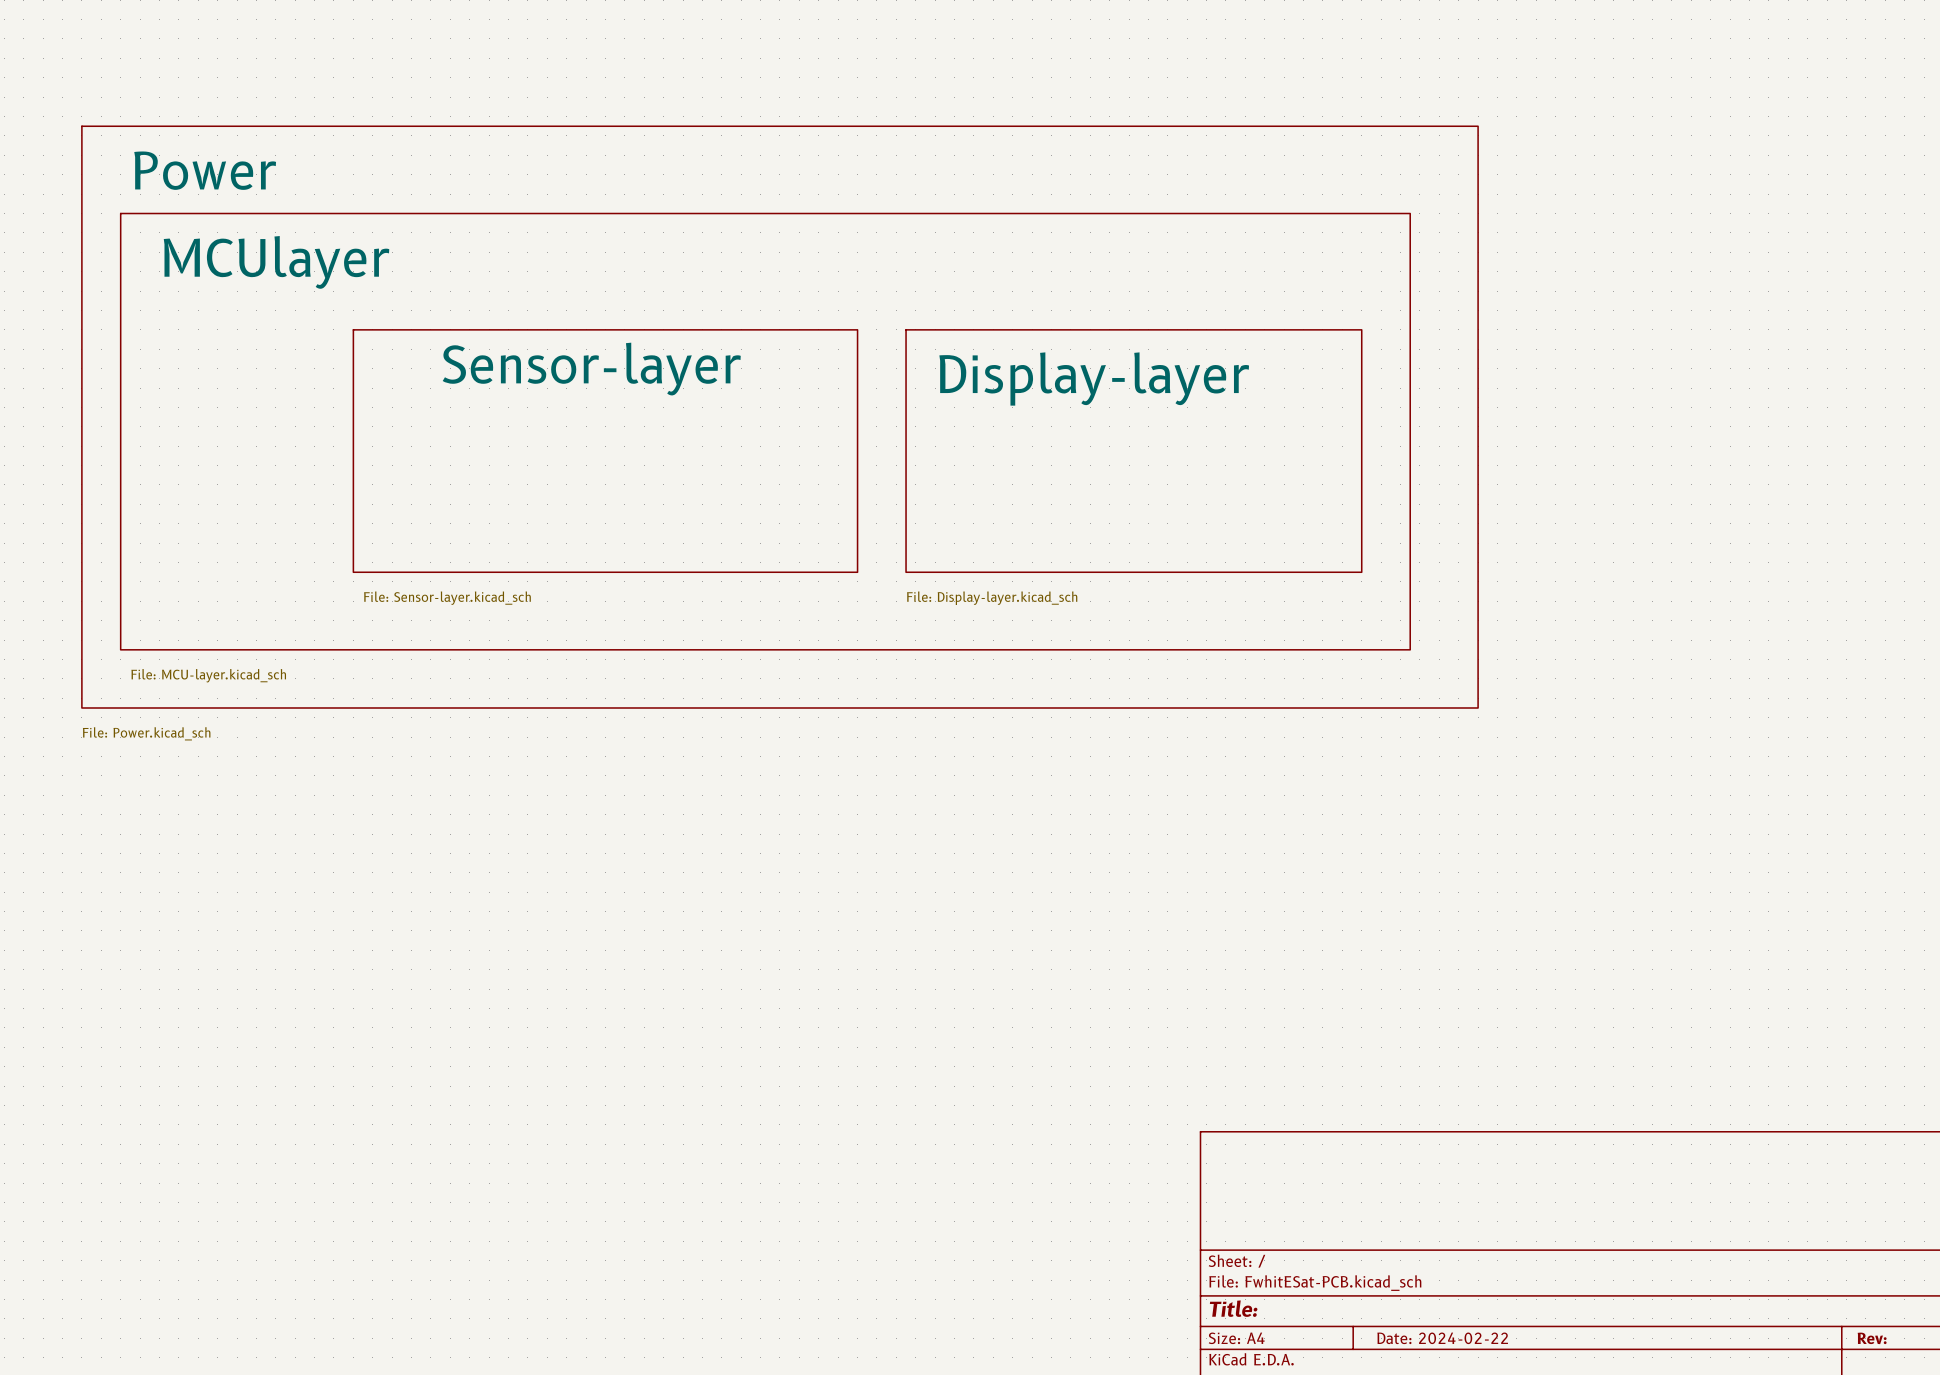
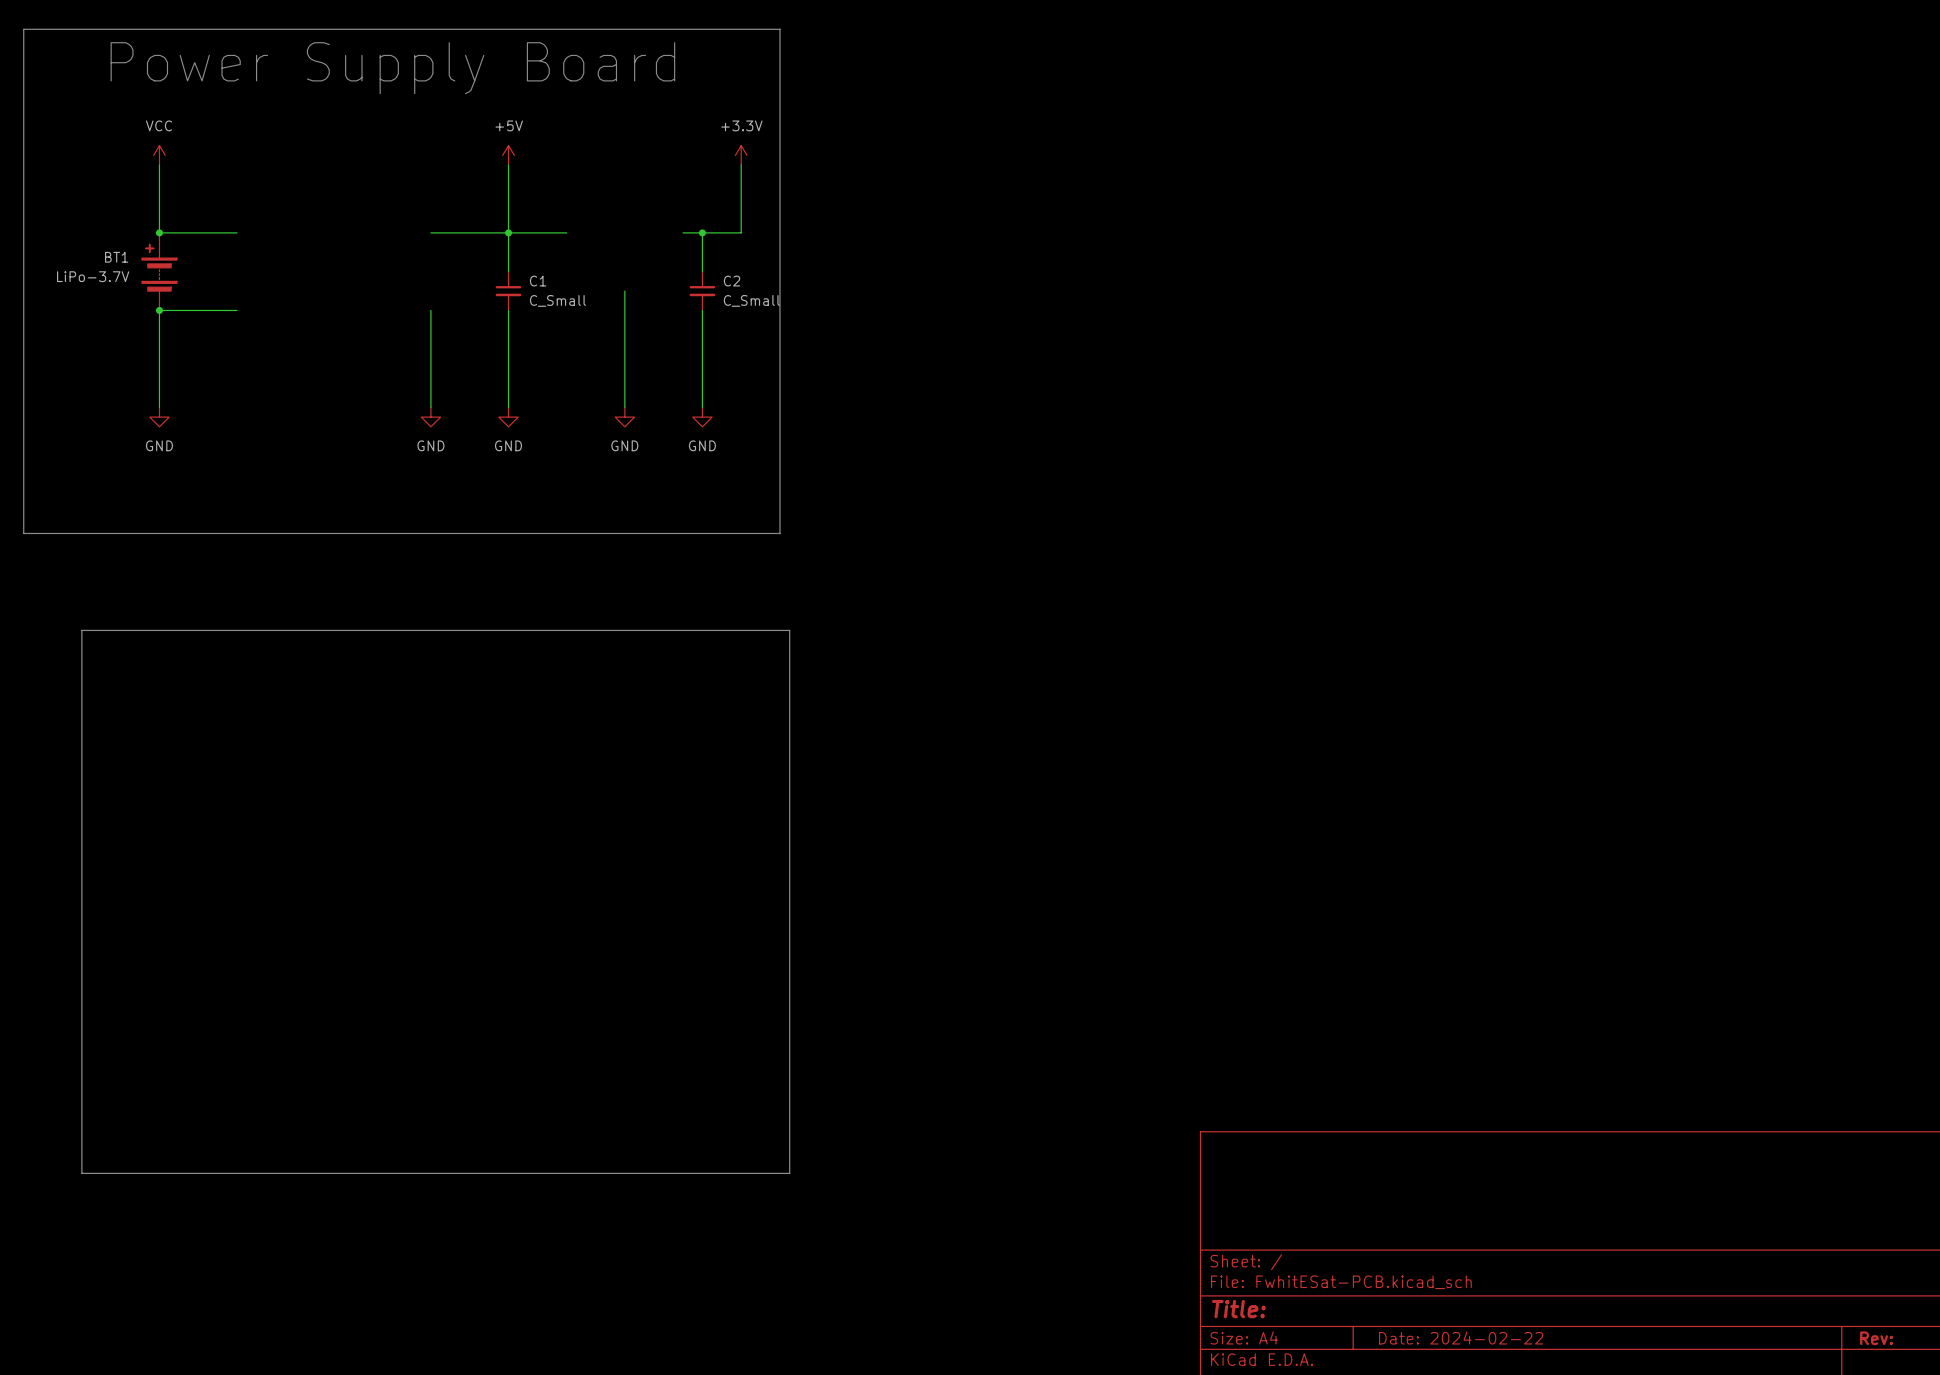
line: none -> (23, 29) (779, 29) (779, 533) (23, 533) (23, 29)
text: none -> Power Supply Board (392, 68)
power symbol: none -> VCC (159, 155)
power symbol: none -> +5V (508, 155)
power symbol: none -> +3.3V (741, 155)
wire: none -> (159, 165) (159, 232) (237, 232)
wire: none -> (508, 165) (508, 271)
wire: none -> (741, 165) (741, 232) (683, 232)
junction: none -> (159, 232)
wire: none -> (430, 232) (566, 232)
junction: none -> (508, 232)
wire: none -> (702, 232) (702, 271)
junction: none -> (702, 232)
BT1: none -> LiPo-3.7V (159, 271)
C1: none -> C_Small (508, 291)
wire: none -> (624, 291) (624, 407)
C2: none -> C_Small (702, 291)
junction: none -> (159, 310)
wire: none -> (237, 310) (159, 310) (159, 407)
wire: none -> (430, 310) (430, 407)
wire: none -> (508, 310) (508, 407)
wire: none -> (702, 310) (702, 407)
power symbol: none -> GND (159, 417)
power symbol: none -> GND (430, 417)
power symbol: none -> GND (508, 417)
power symbol: none -> GND (624, 417)
power symbol: none -> GND (702, 417)
sheet Power: File: Power.kicad_sch (779, 417) -> none
sheet MCUlayer: File: MCU-layer.kicad_sch (765, 431) -> none
sheet Sensor-layer: File: Sensor-layer.kicad_sch (605, 451) -> none
sheet Display-layer: File: Display-layer.kicad_sch (1133, 451) -> none
line: none -> (81, 630) (789, 630) (789, 1173) (81, 1173) (81, 630)

